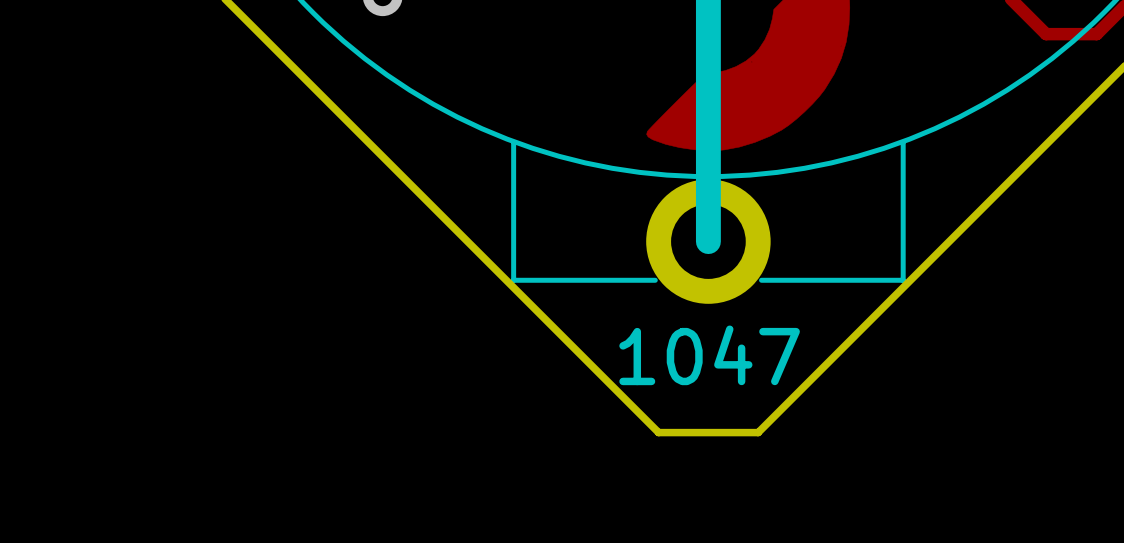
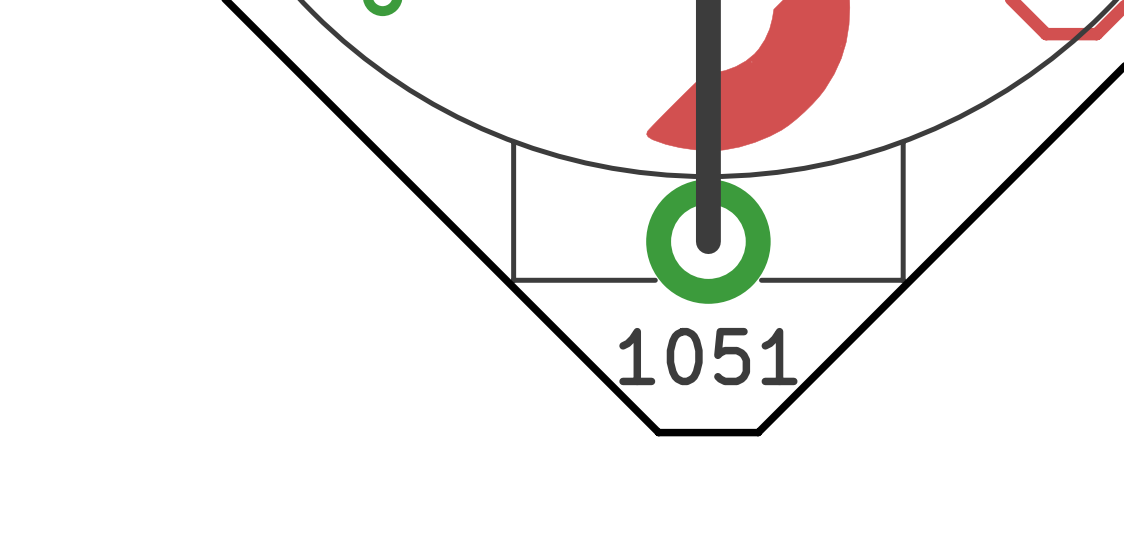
text: 1047 (709, 355) -> 1051 (708, 356)

